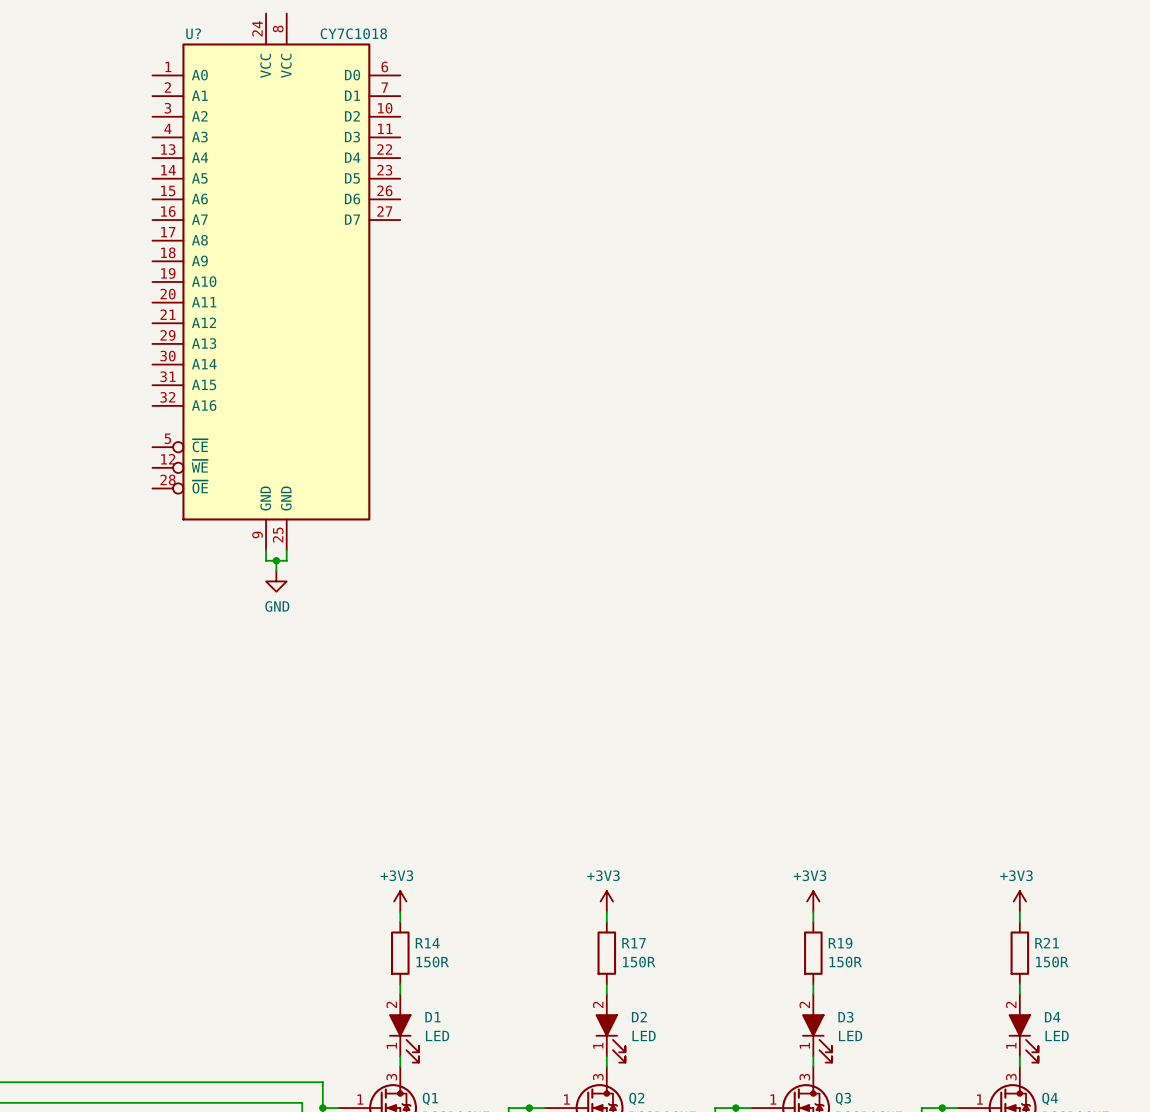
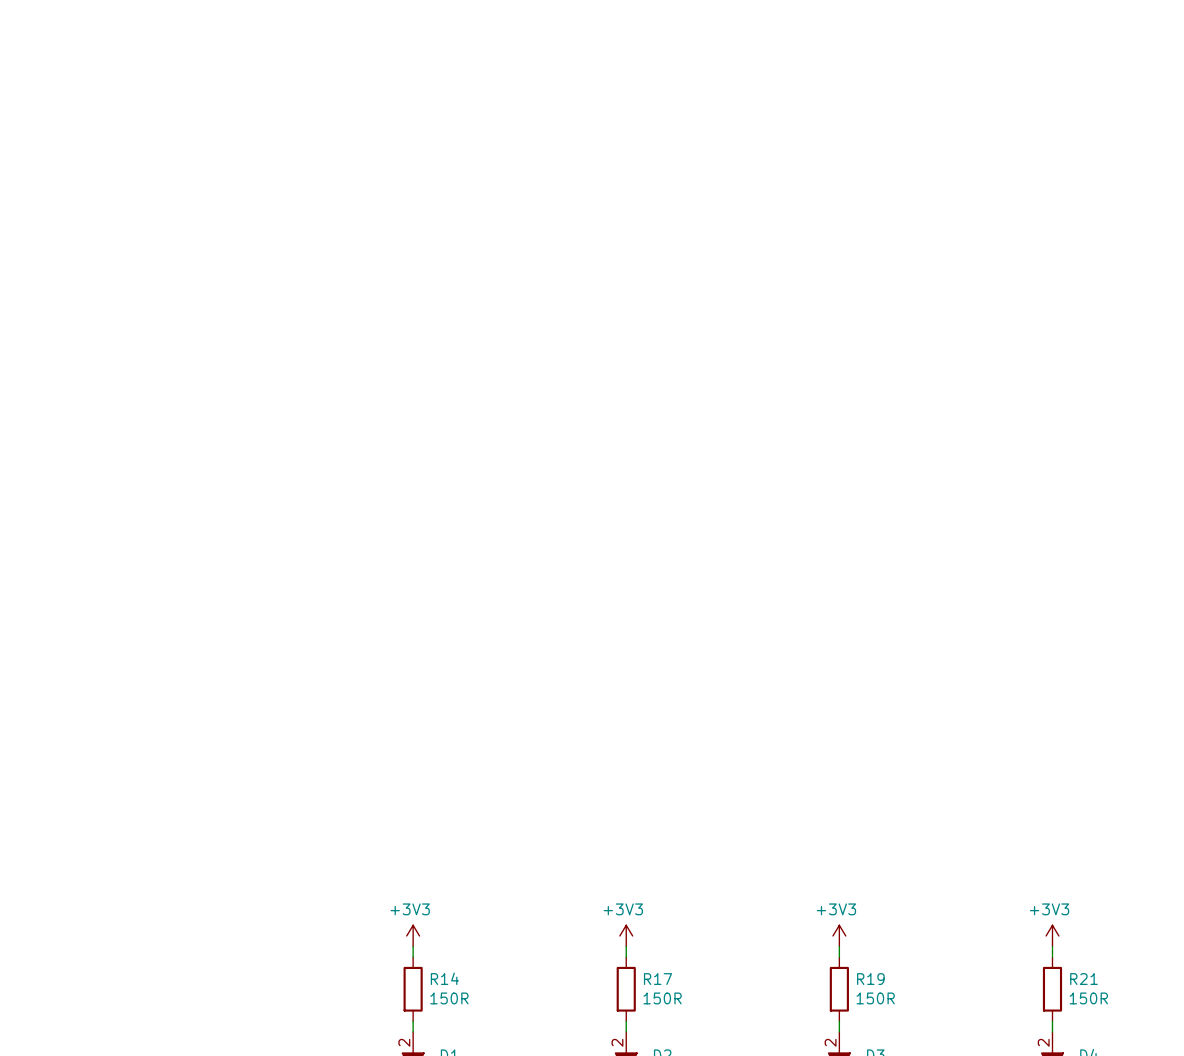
U?: CY7C1018 (276, 281) -> none
wire: (266, 550) (266, 560) (286, 560) (286, 550) -> none
wire: (276, 560) (276, 571) -> none
junction: (276, 560) -> none
power symbol: GND (276, 581) -> none

